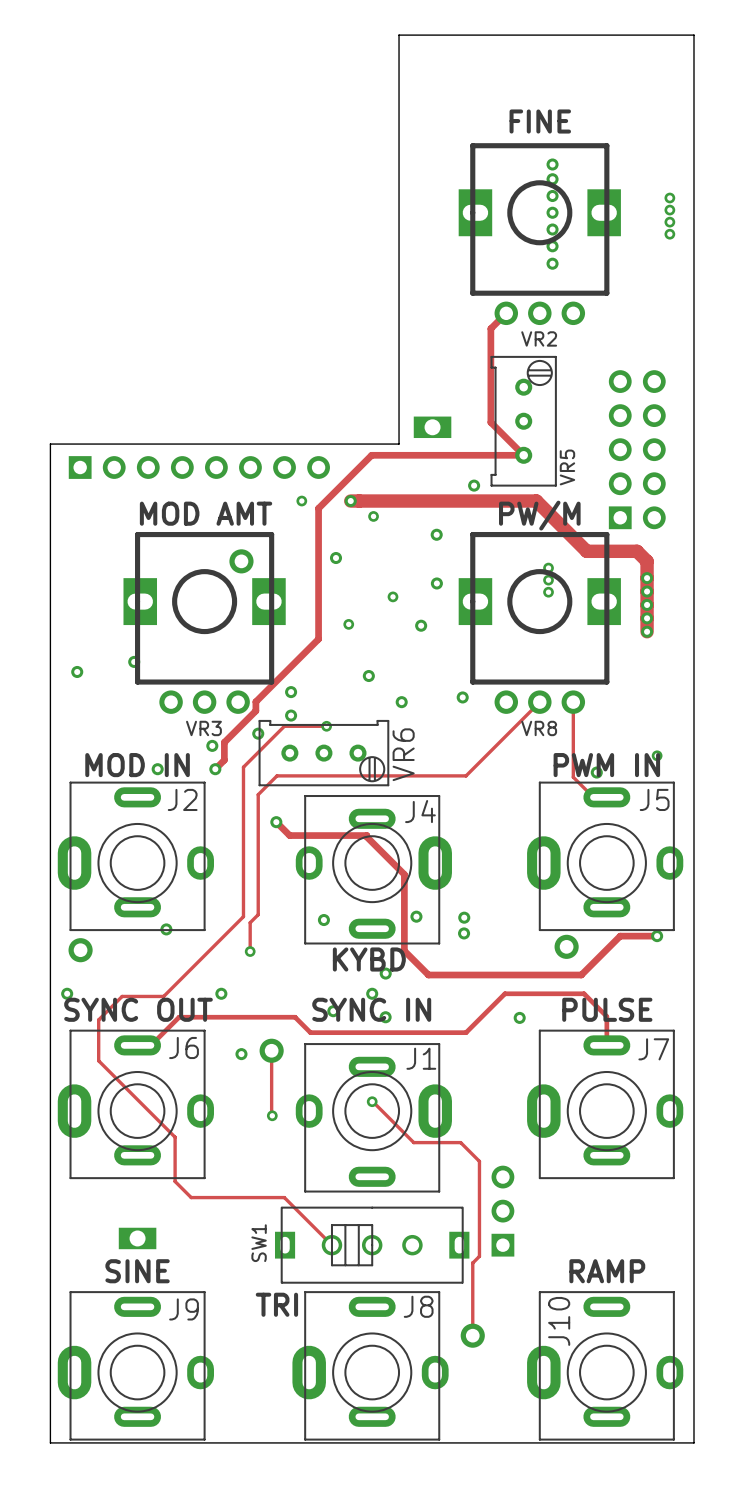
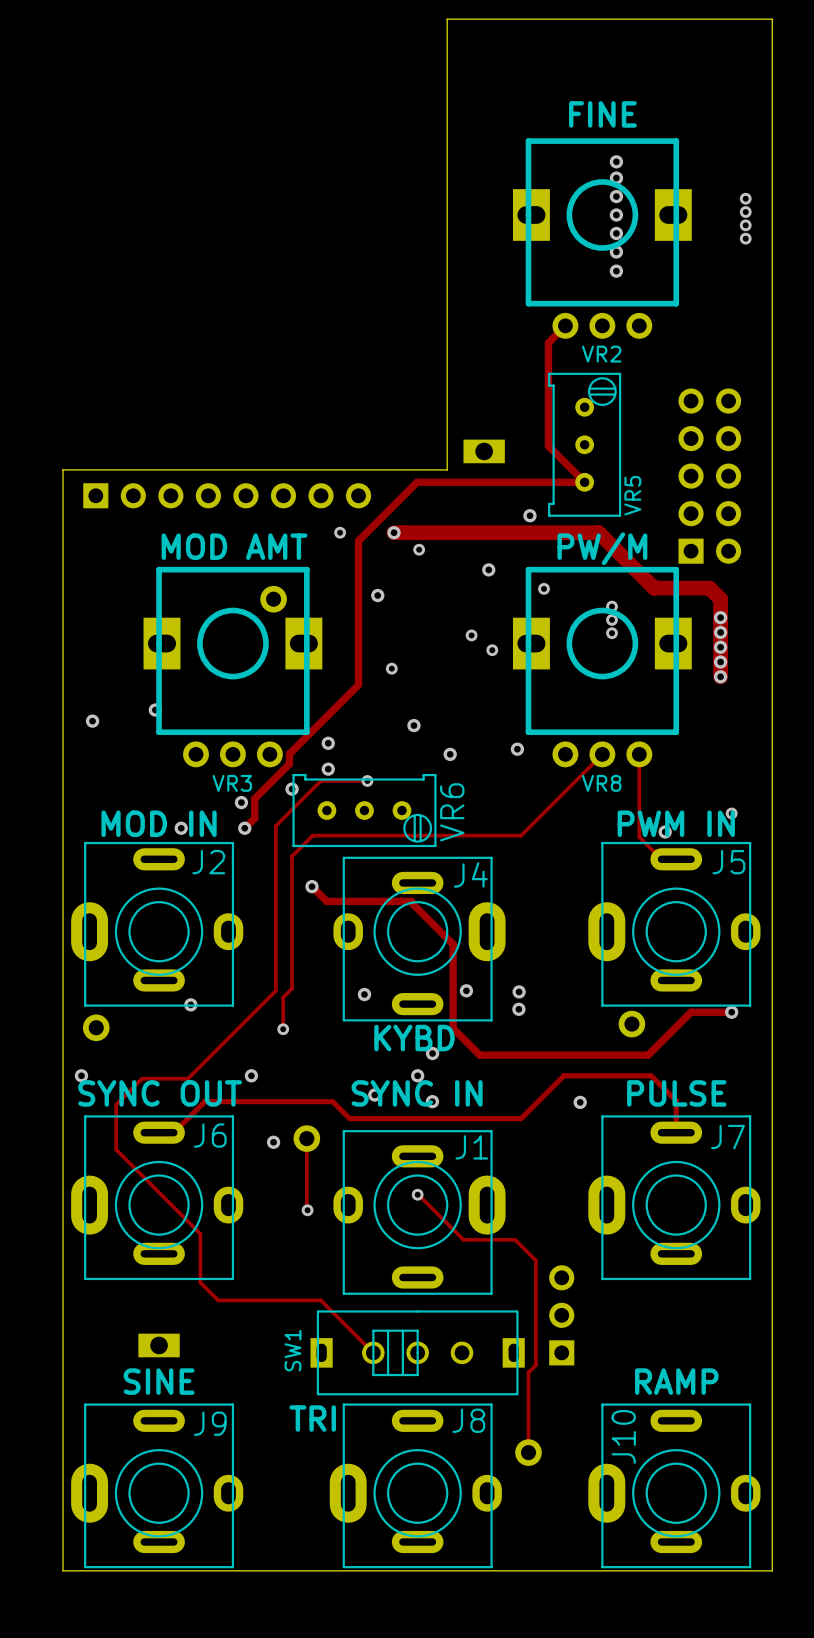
via: none -> (544, 588)
via: (436, 583) -> none
via: none -> (471, 635)
via: (392, 596) -> none
via: none -> (492, 650)
via: (421, 625) -> none

